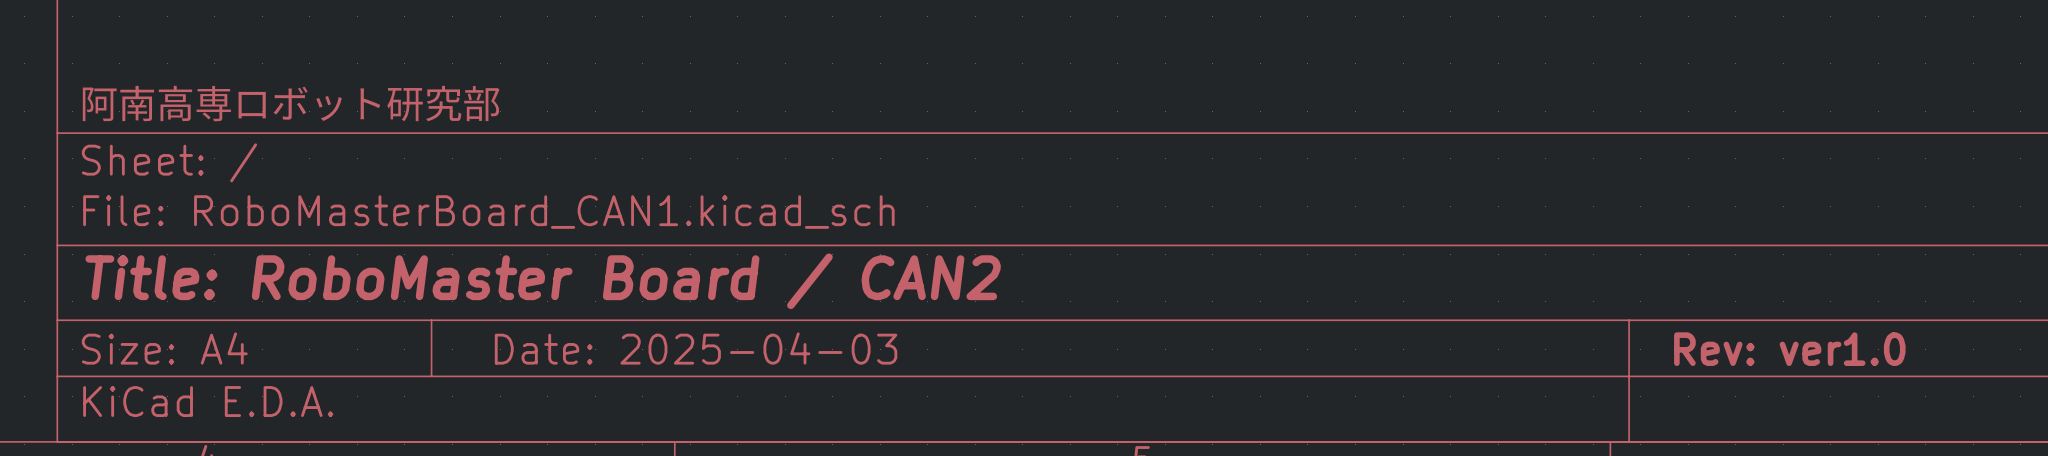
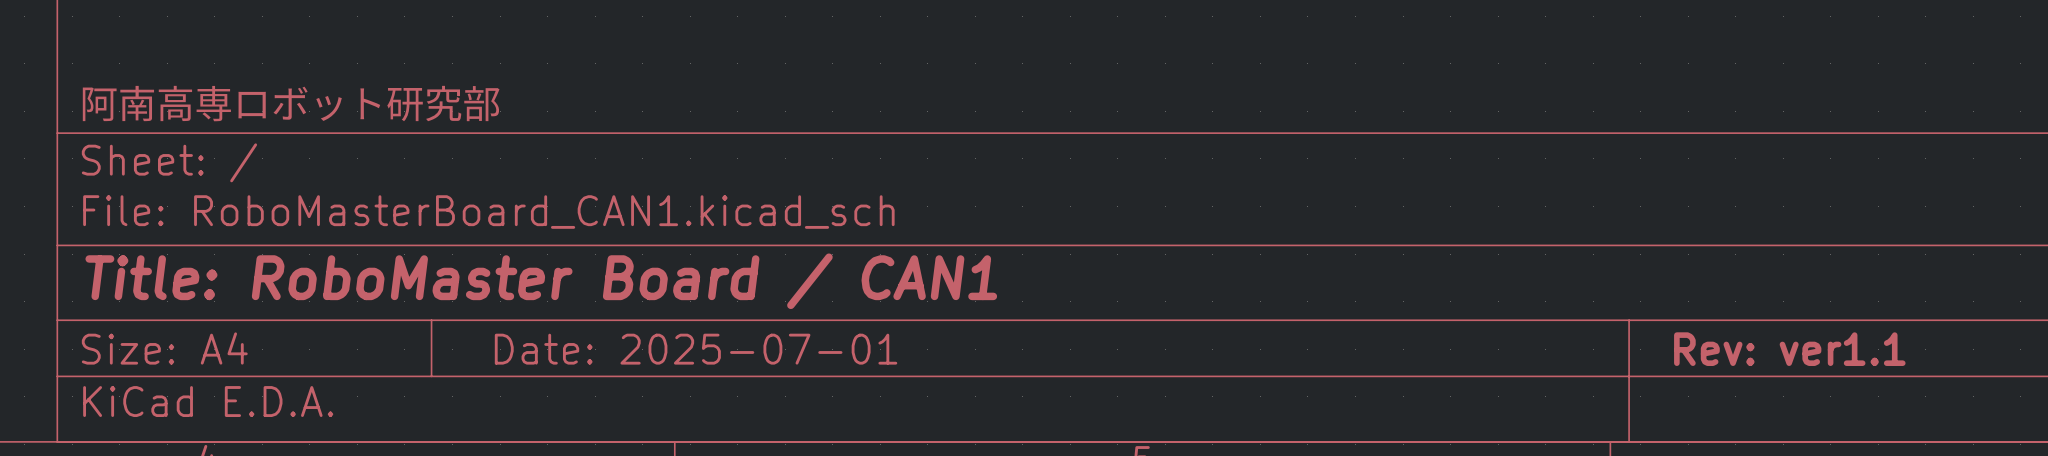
title block: Title: RoboMaster Board / CAN2 (543, 281) -> Title: RoboMaster Board / CAN1 (541, 281)
title block: Date: 2025-04-03 (696, 348) -> Date: 2025-07-01 (696, 349)
title block: Rev: ver1.0 (1789, 349) -> Rev: ver1.1 (1789, 349)

